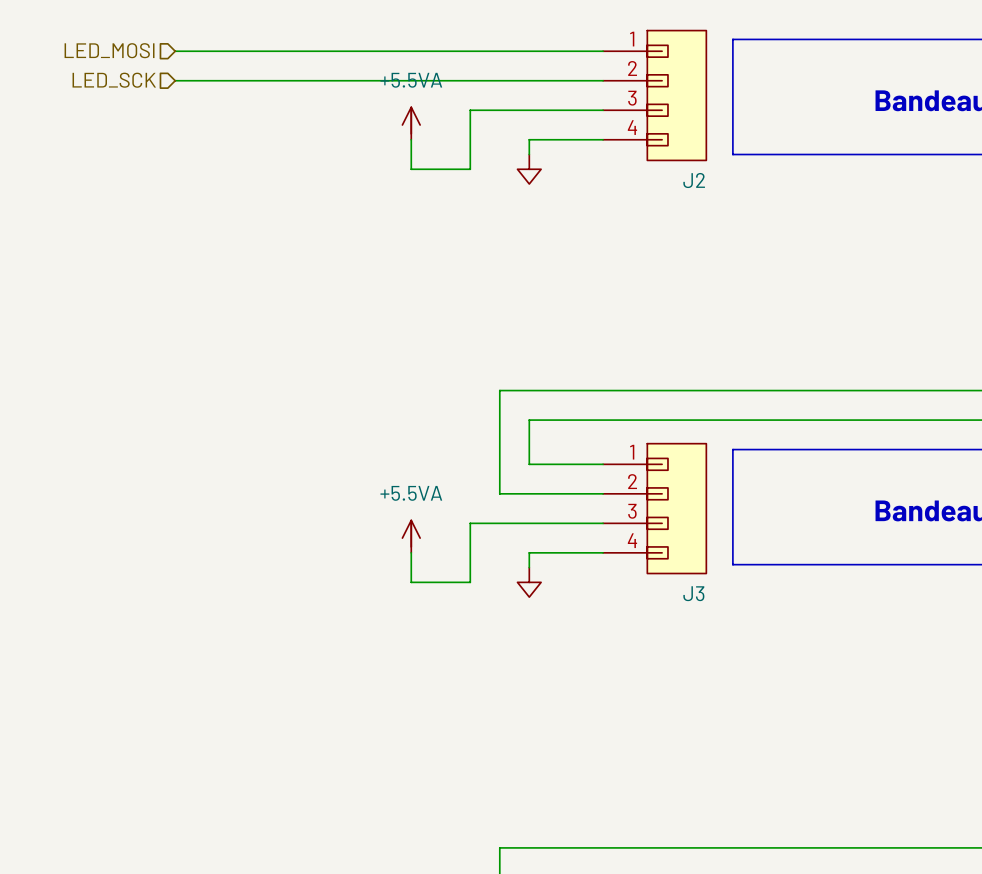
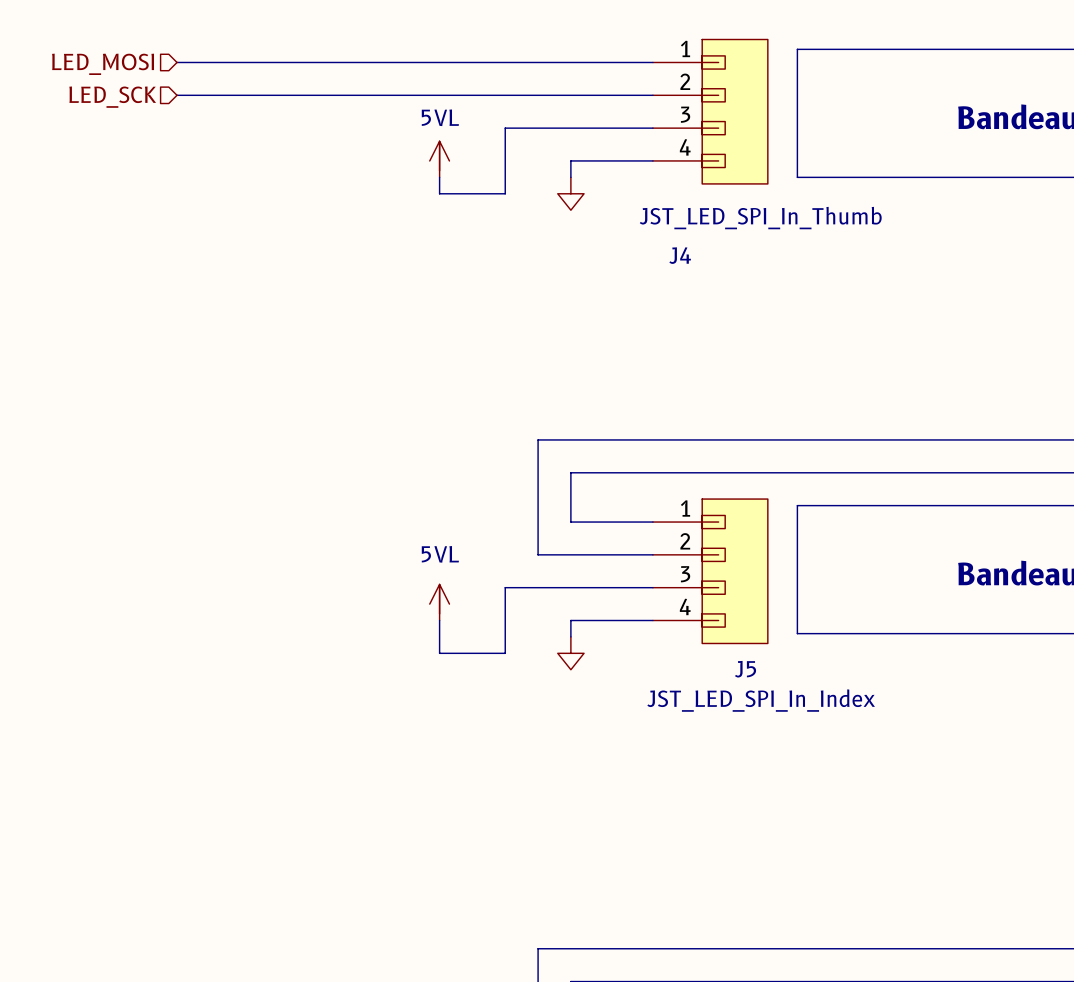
power symbol: +5.5VA (411, 123) -> none
power symbol: none -> 5VL (439, 159)
J2 name: J2 (694, 180) -> J4 (680, 255)
J2 value: none -> JST_LED_SPI_In_Thumb (760, 218)
power symbol: +5.5VA (411, 536) -> 5VL (439, 602)
J3 name: J3 (693, 593) -> J5 (745, 669)
J3 value: none -> JST_LED_SPI_In_Index (761, 700)

